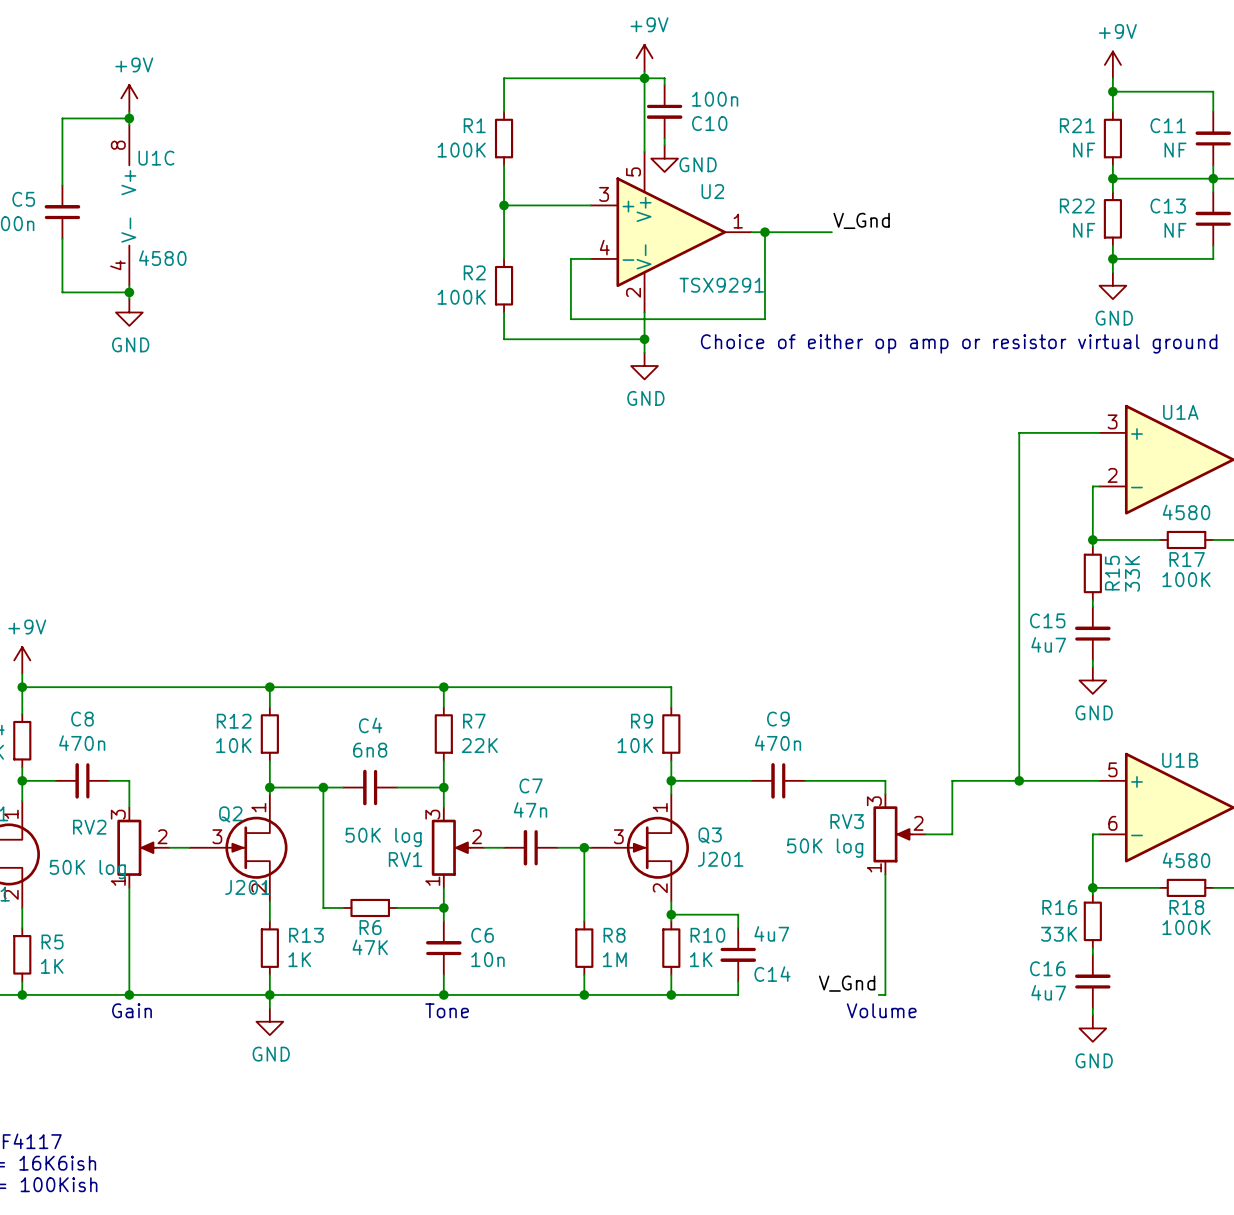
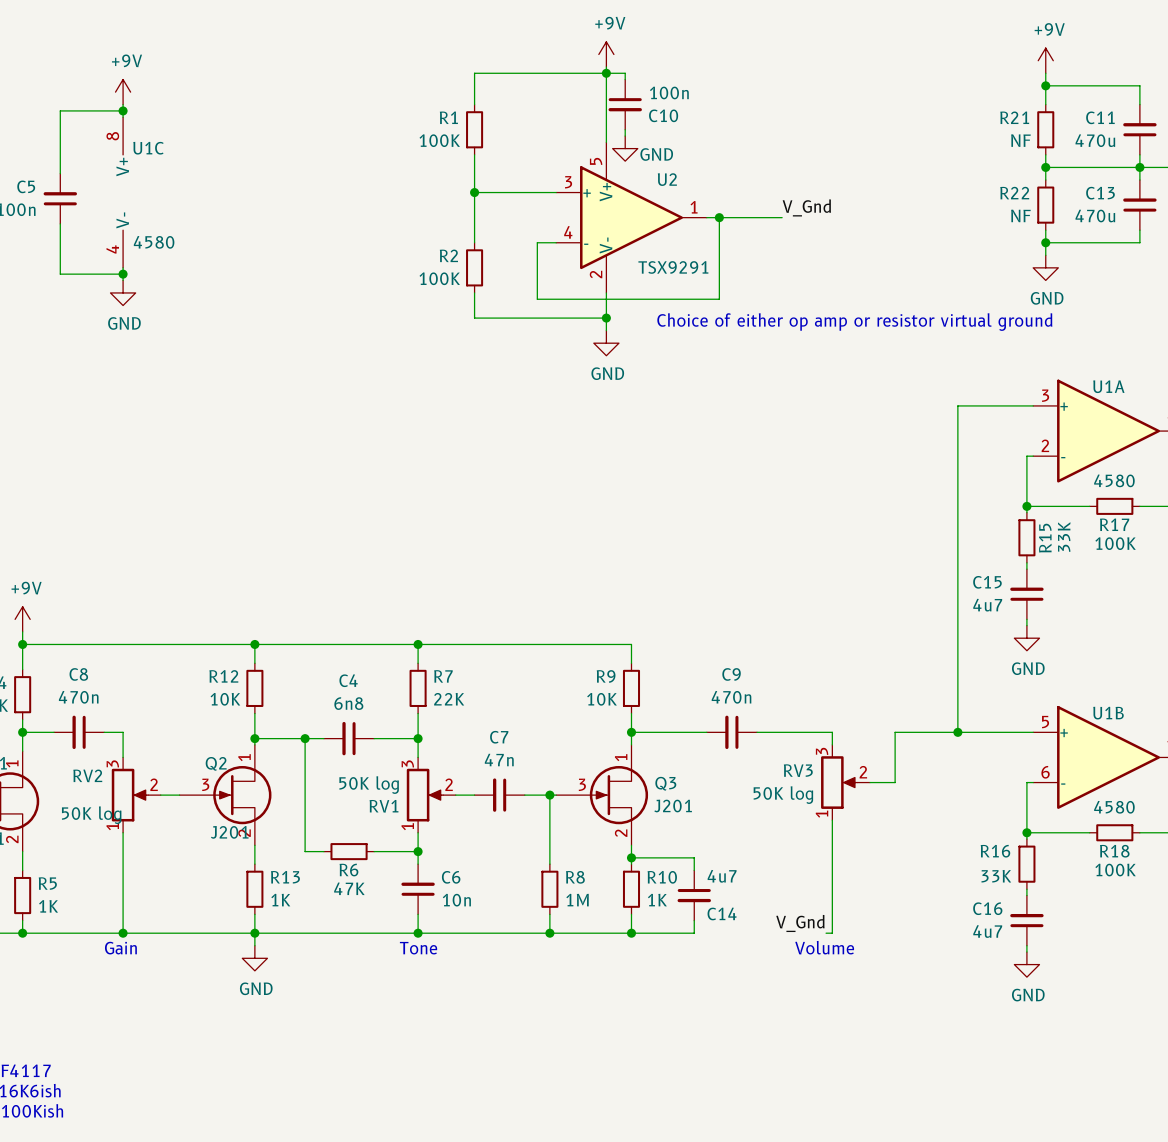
C11 value: NF (1175, 150) -> 470u (1095, 140)
C13 value: NF (1175, 230) -> 470u (1095, 215)

